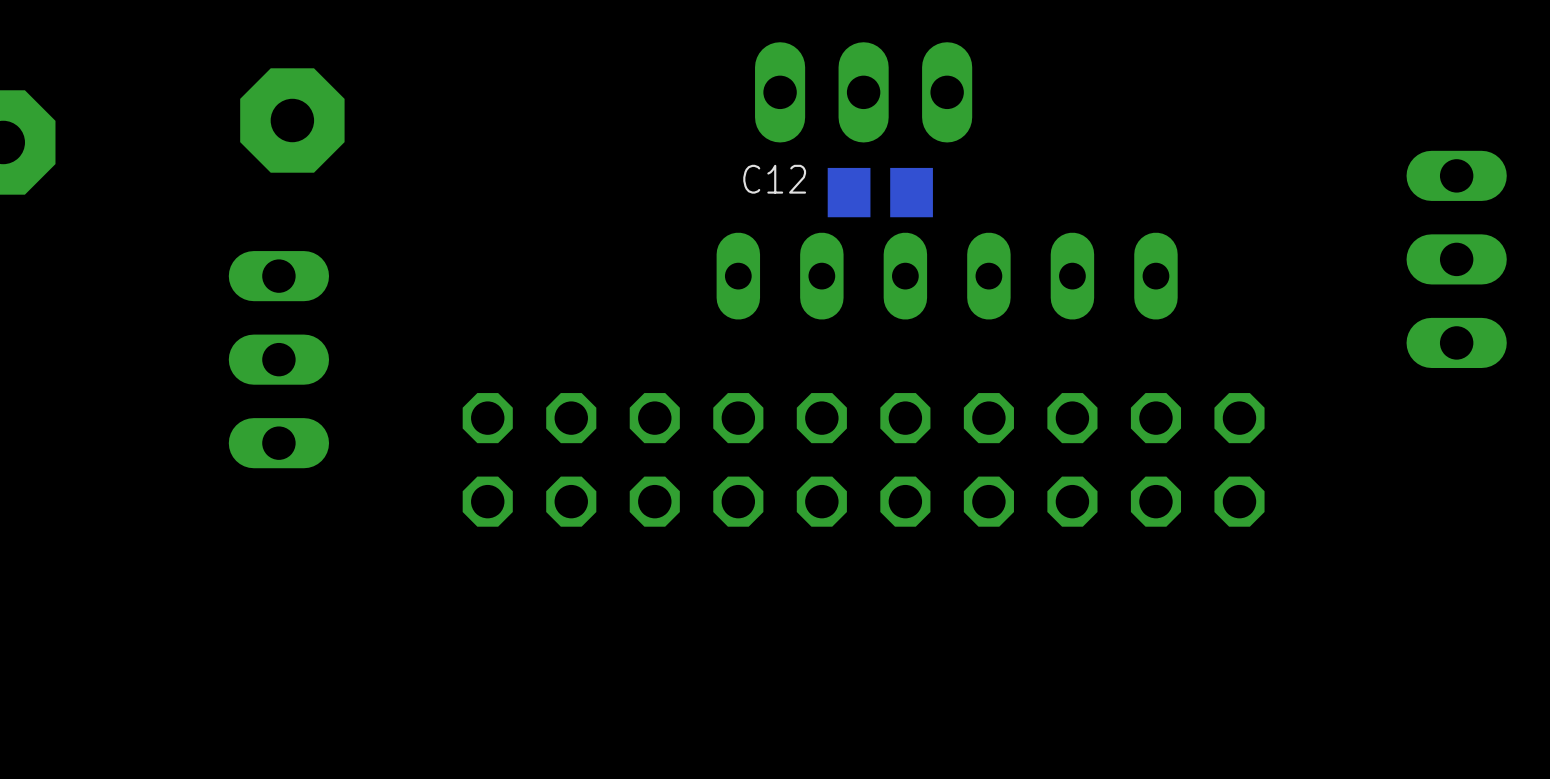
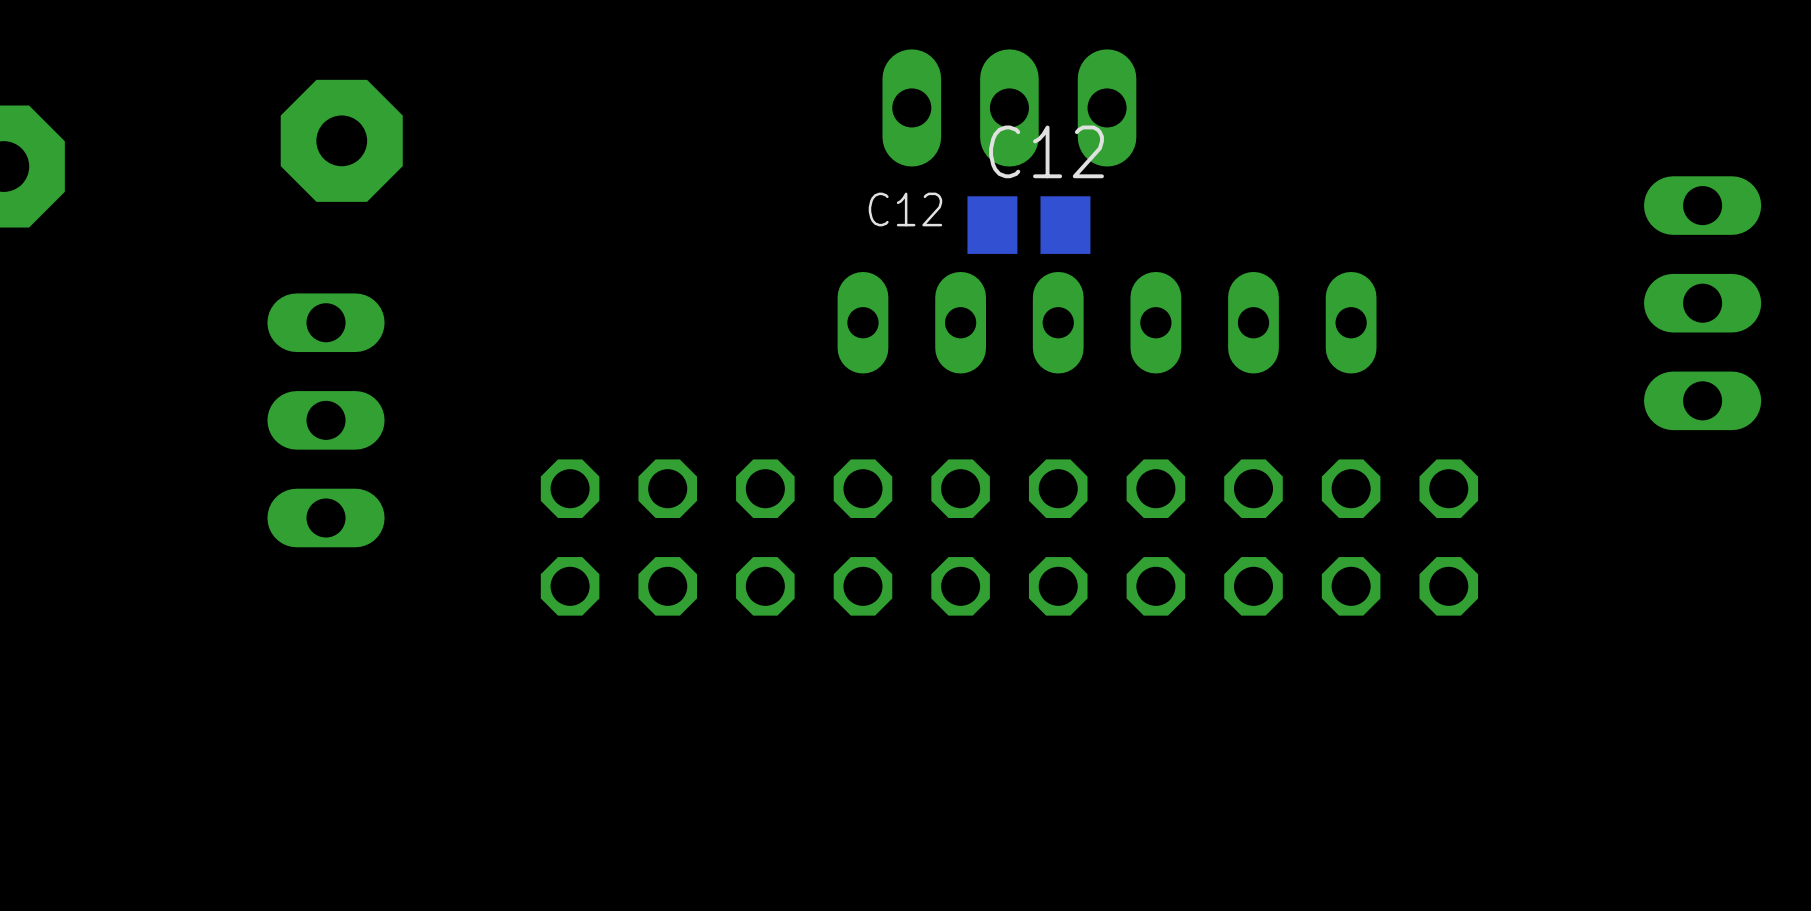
C12 name: none -> C12 (1046, 151)

